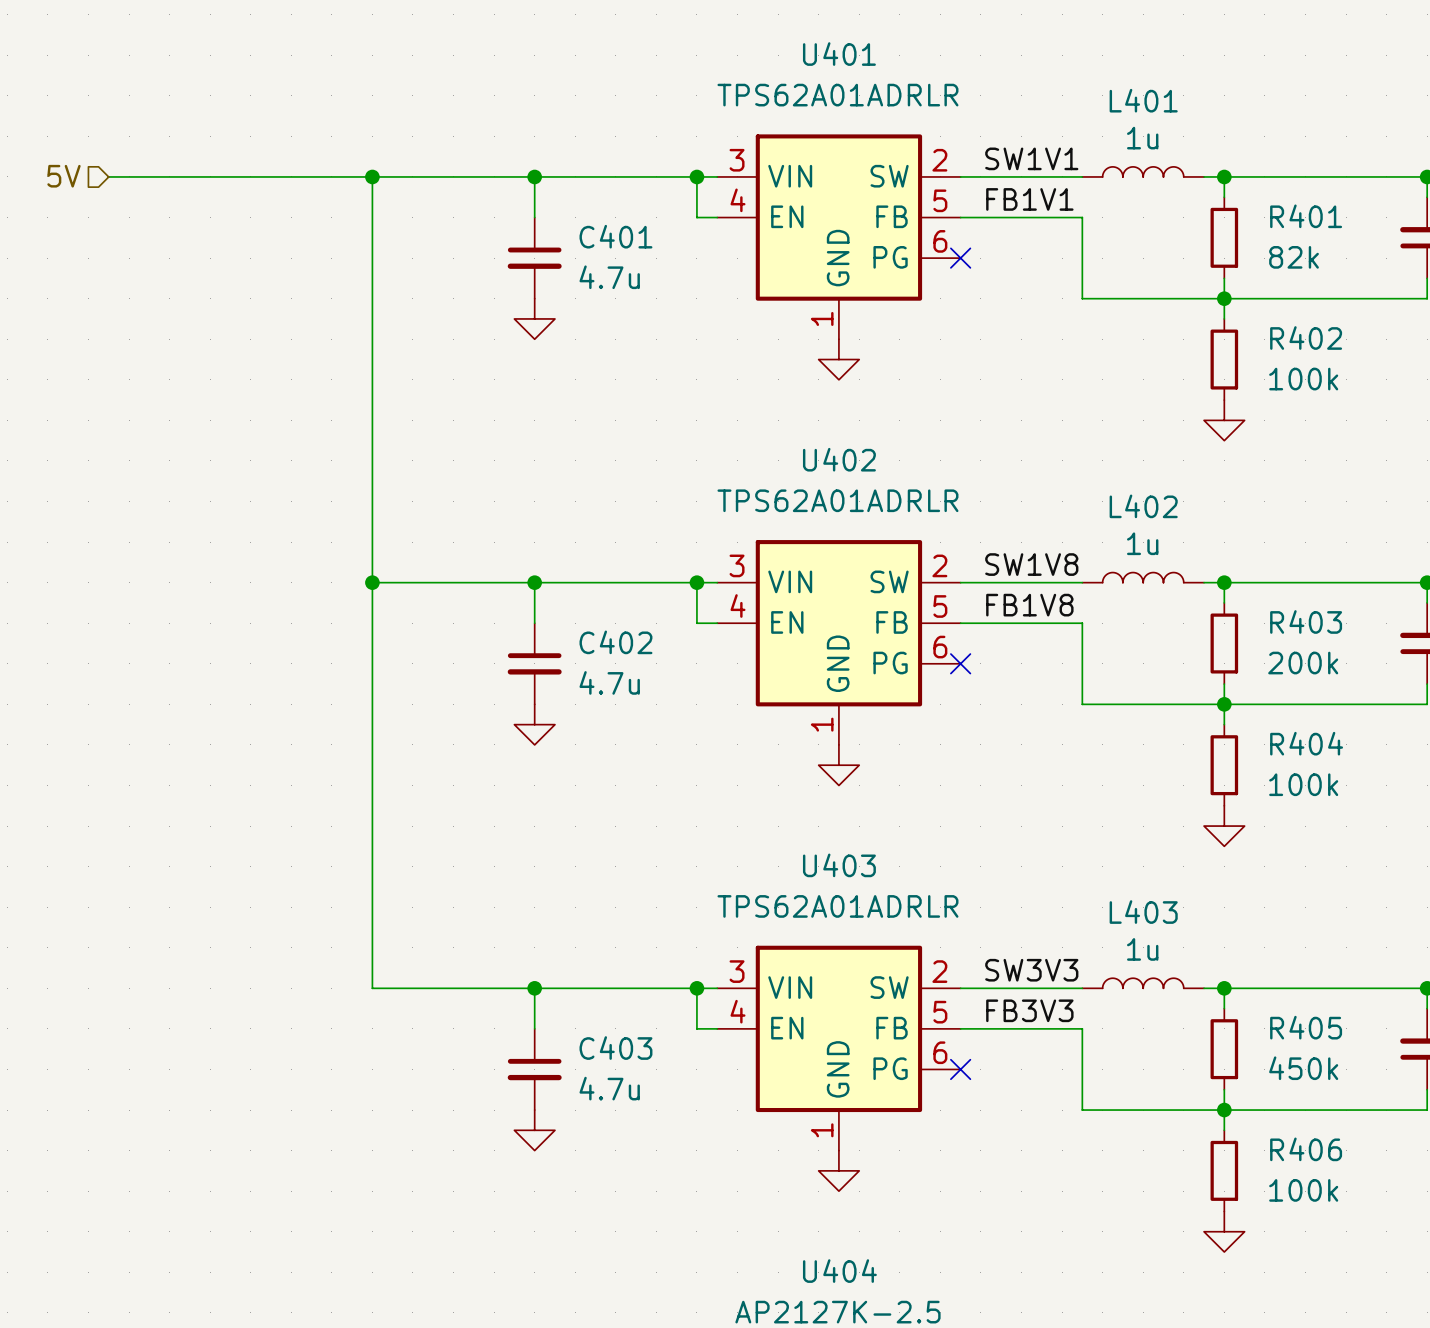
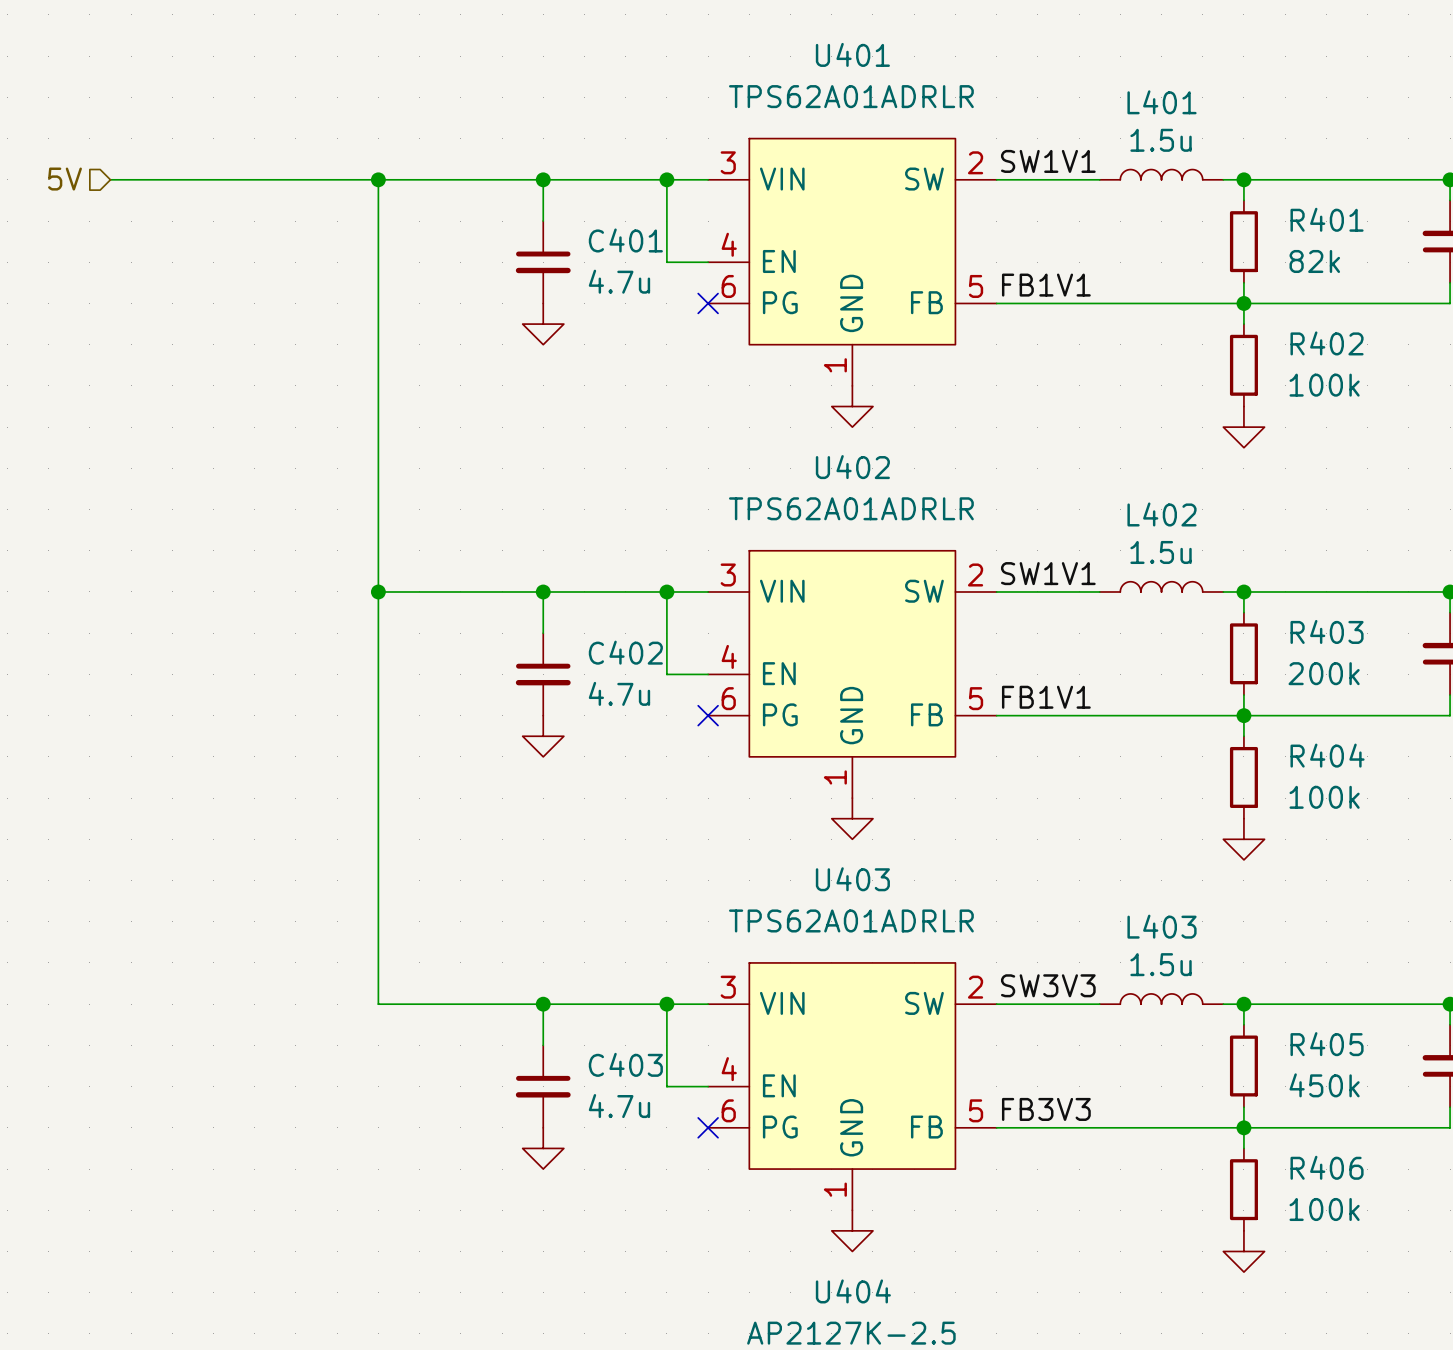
U401 symbol: [717, 134, 961, 340] -> [708, 138, 997, 386]
L401 value: 1u (1142, 138) -> 1.5u (1161, 140)
wire: none -> (666, 179) (666, 262) (708, 262)
junction position: (696, 176) -> (666, 179)
wire: (717, 176) (696, 176) (696, 217) (717, 217) -> none
label position: FB1V1 (1029, 199) -> FB1V1 (1046, 285)
wire: (960, 217) (1082, 217) (1082, 298) -> (996, 303) (1099, 303)
no-connect mark: (960, 258) -> none
no-connect mark: none -> (708, 303)
power symbol position: (838, 359) -> (852, 406)
U402 symbol: [717, 540, 961, 745] -> [708, 550, 997, 799]
L402 value: 1u (1142, 543) -> 1.5u (1161, 552)
label: SW1V8 (1031, 564) -> SW1V1 (1048, 573)
wire: none -> (666, 591) (666, 674) (708, 674)
junction position: (696, 582) -> (666, 591)
wire: (717, 582) (696, 582) (696, 623) (717, 623) -> none
label: FB1V8 (1029, 605) -> none
wire: (960, 623) (1082, 623) (1082, 704) -> (996, 715) (1099, 715)
no-connect mark: (960, 663) -> none
label: none -> FB1V1 (1046, 697)
no-connect mark: none -> (708, 715)
power symbol position: (838, 765) -> (852, 818)
U403 symbol: [717, 945, 961, 1151] -> [708, 962, 997, 1211]
L403 value: 1u (1142, 949) -> 1.5u (1161, 964)
wire: none -> (666, 1004) (666, 1086) (708, 1086)
junction position: (696, 988) -> (666, 1004)
wire: (717, 988) (696, 988) (696, 1028) (717, 1028) -> none
label position: FB3V3 (1029, 1010) -> FB3V3 (1046, 1109)
wire: (960, 1028) (1082, 1028) (1082, 1110) -> (996, 1127) (1099, 1127)
no-connect mark: (960, 1069) -> none
no-connect mark: none -> (708, 1127)
power symbol position: (838, 1170) -> (852, 1230)

